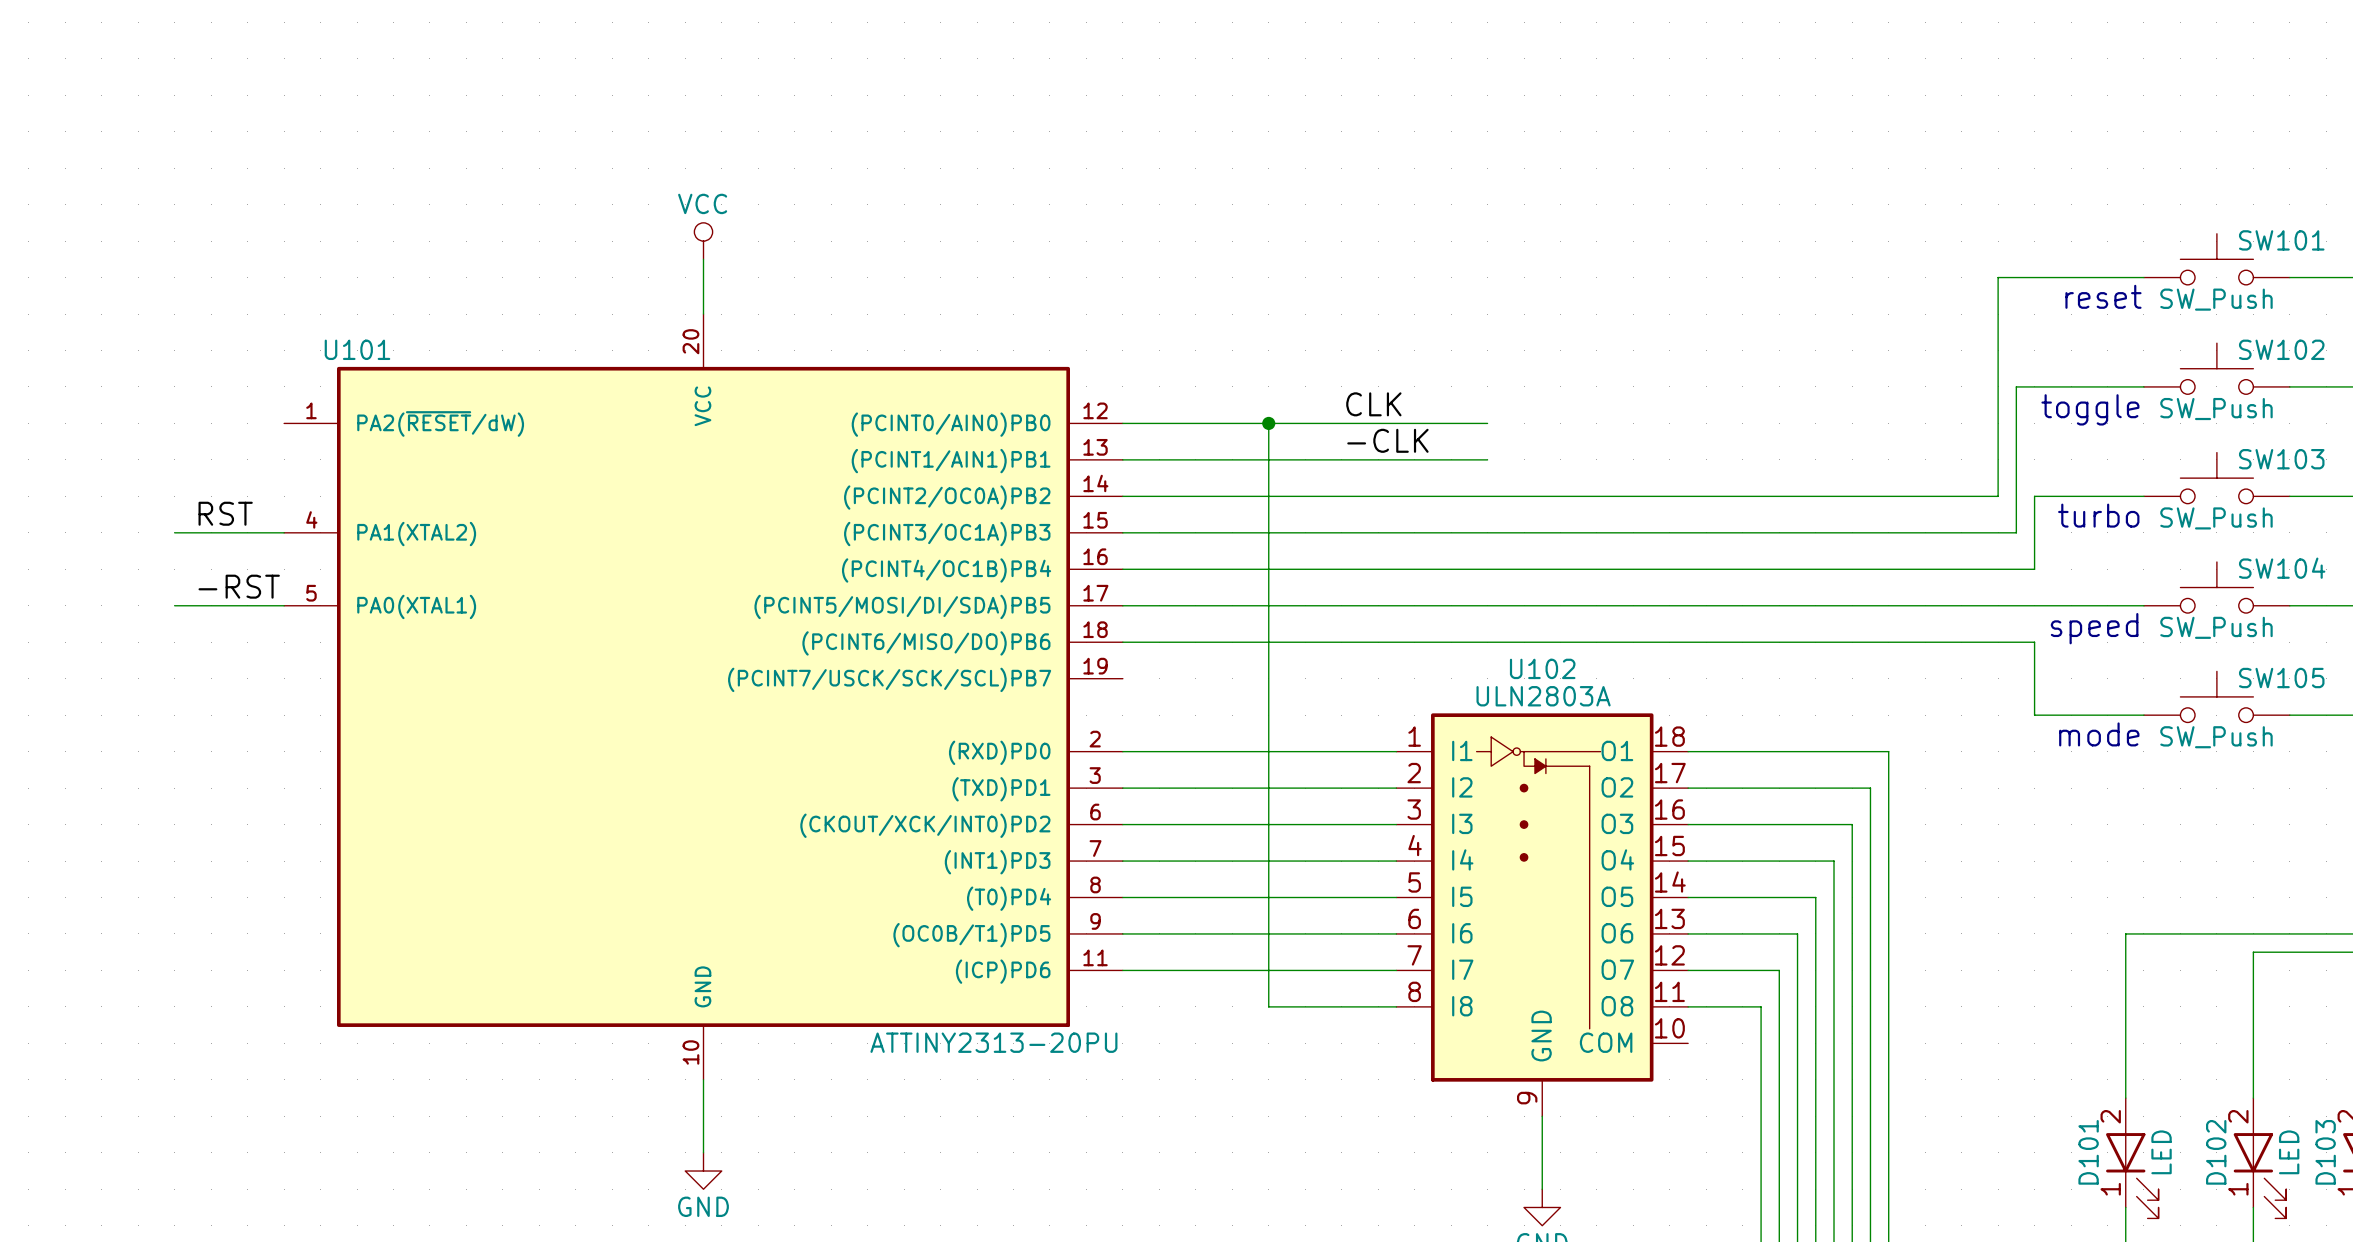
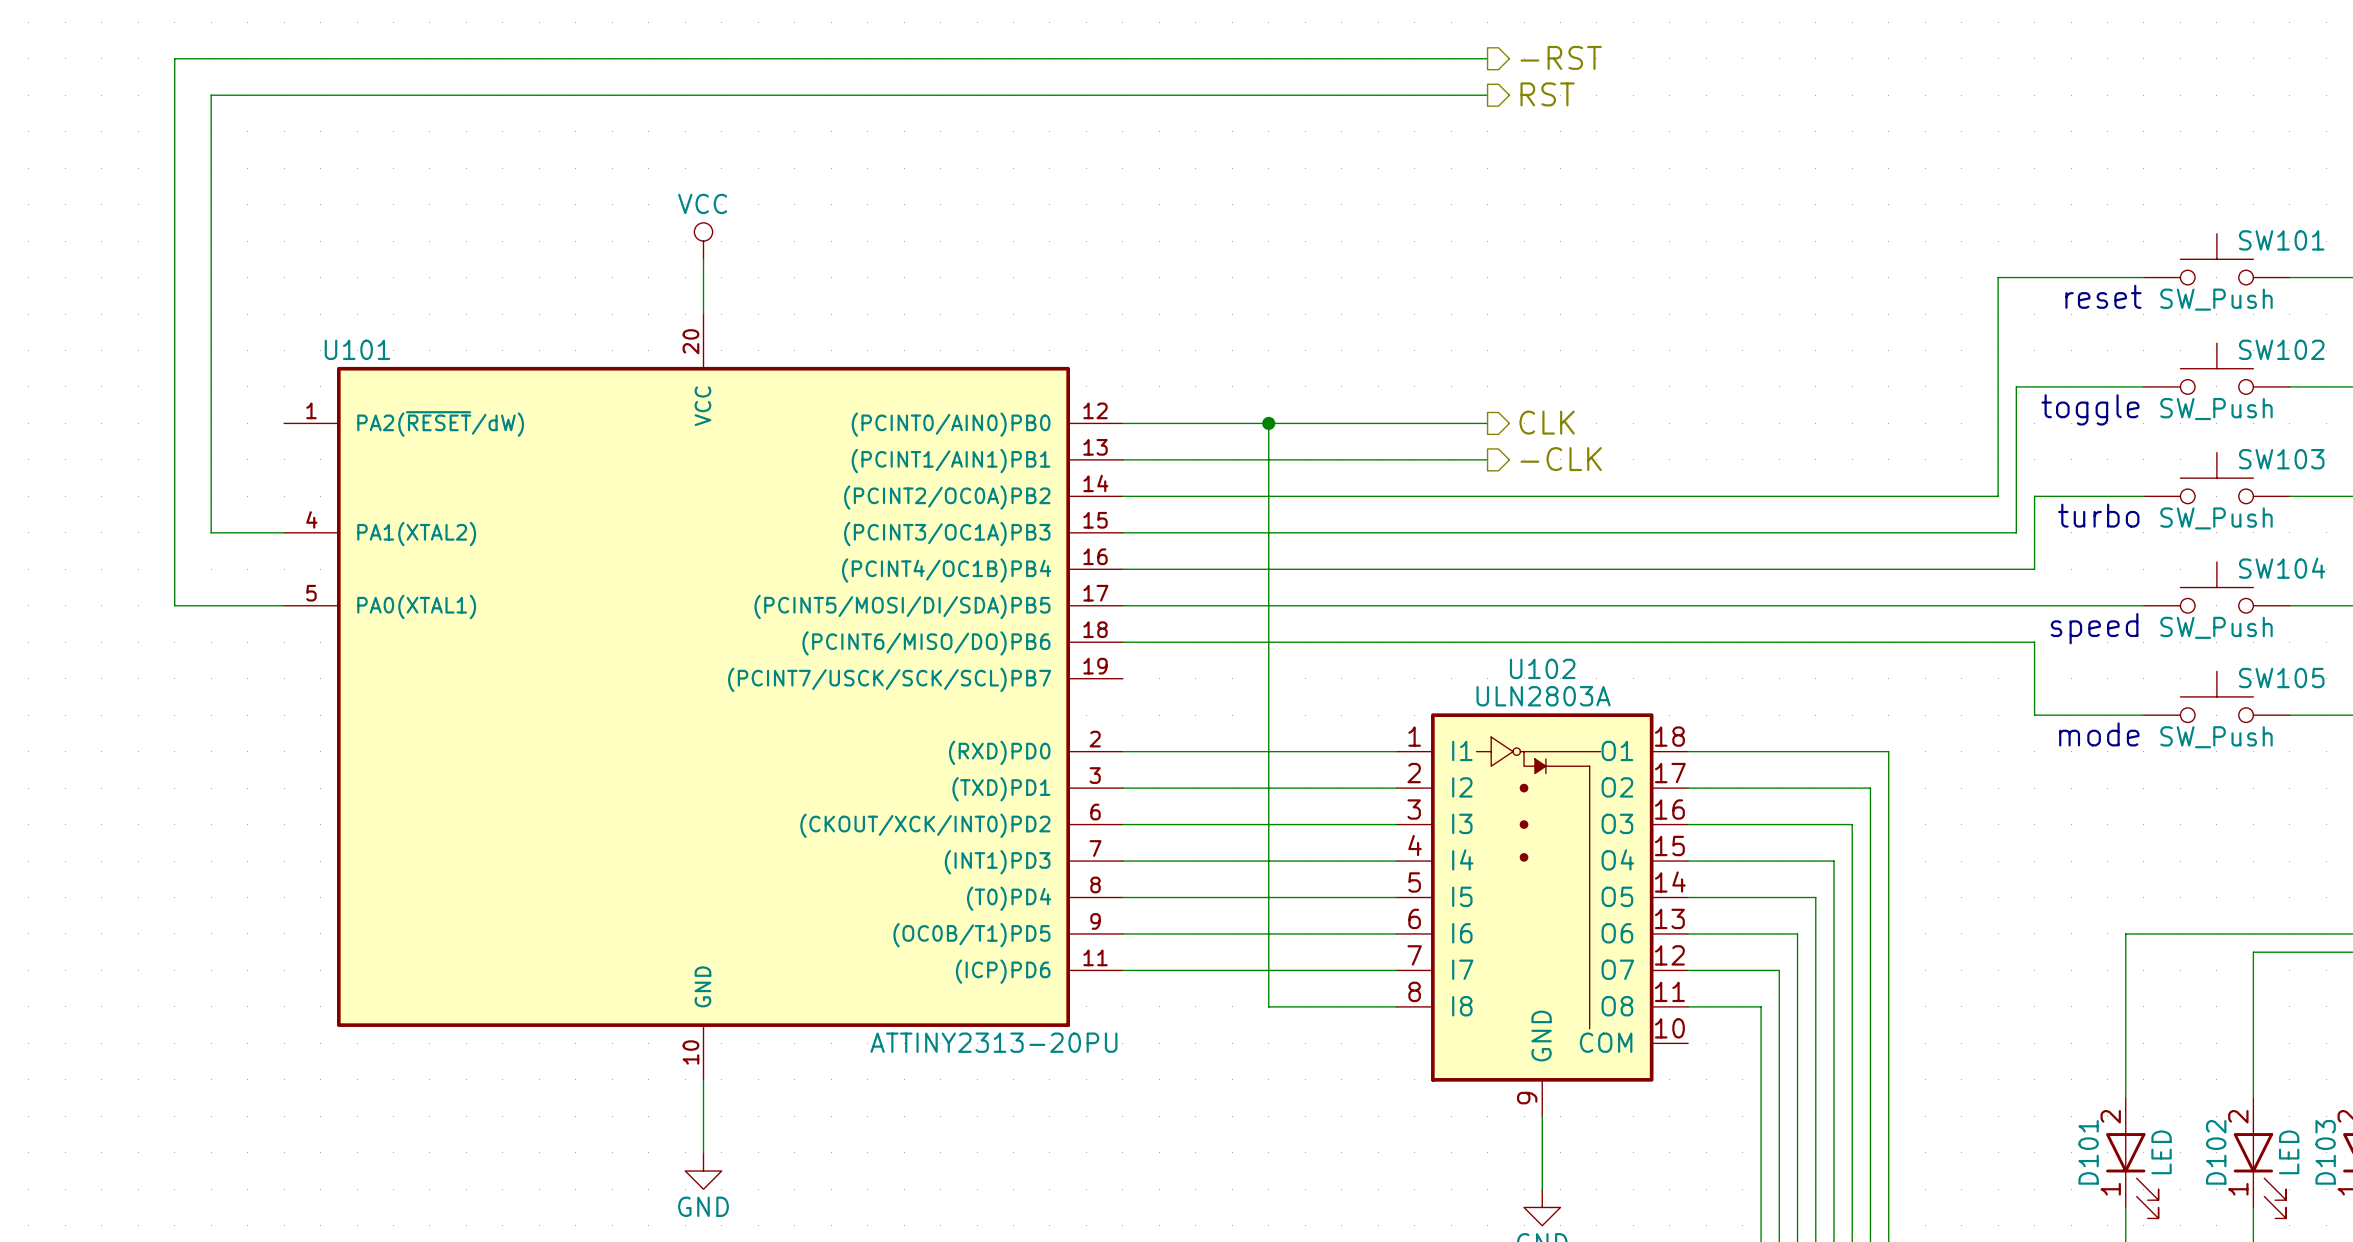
hierarchical label: none -> -RST (1561, 57)
wire: none -> (1487, 58) (174, 58) (174, 605)
hierarchical label: none -> RST (1547, 94)
label: CLK (1373, 404) -> none
hierarchical label: none -> CLK (1547, 422)
label: -CLK (1387, 440) -> none
hierarchical label: none -> -CLK (1561, 459)
label: RST (225, 513) -> none
wire: (174, 532) (211, 532) -> (1487, 95) (211, 95) (211, 532)
label: -RST (239, 586) -> none

